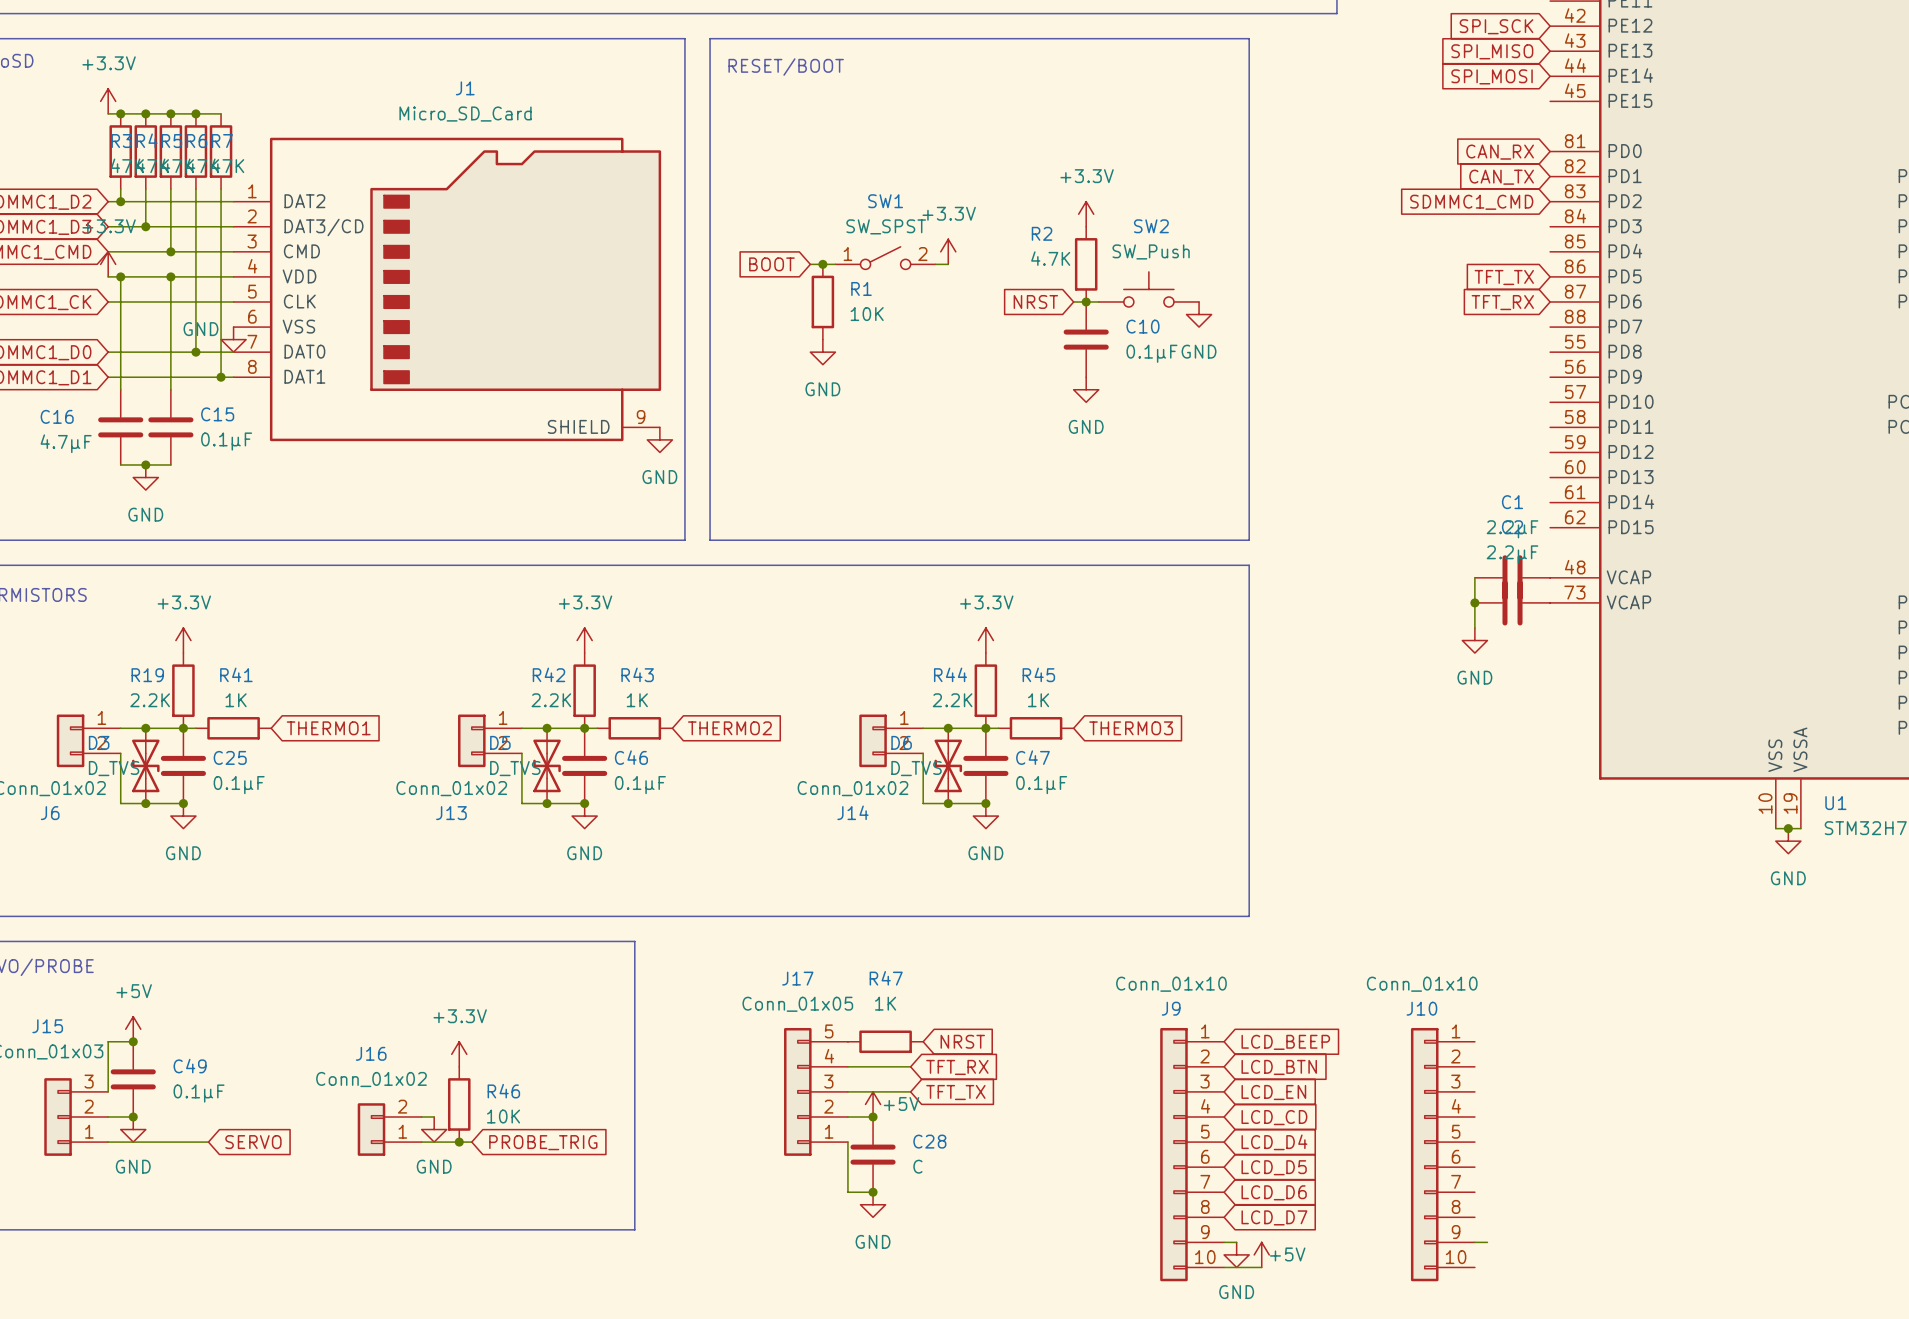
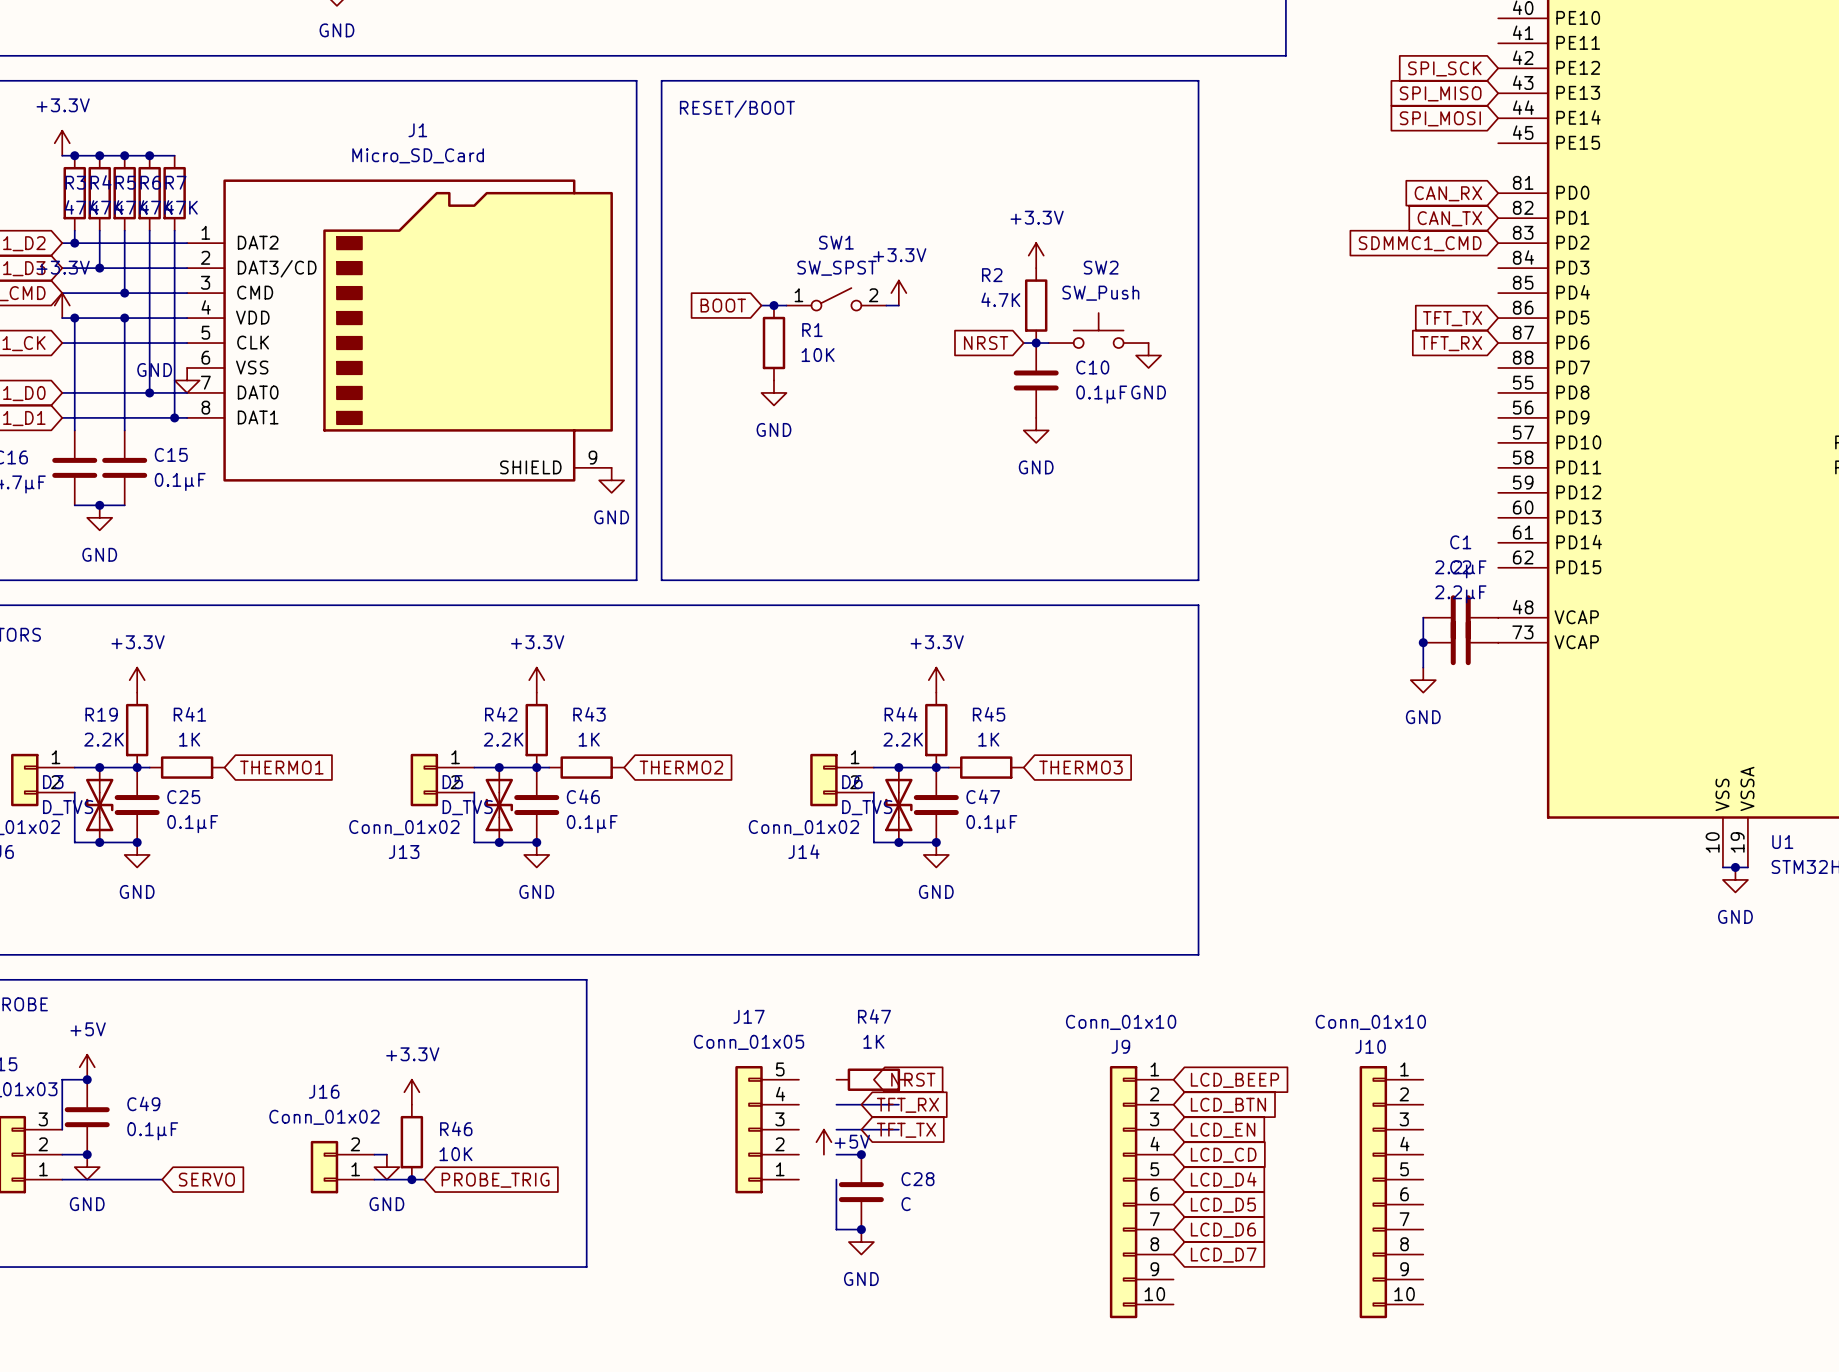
R47 position: (885, 1041) -> (873, 1079)
wire: (847, 1066) (885, 1066) -> (861, 1104) (898, 1104)
wire: (847, 1091) (885, 1091) -> (861, 1129) (898, 1129)
wire: (847, 1117) (873, 1117) -> (836, 1154) (861, 1154)
junction position: (873, 1117) -> (861, 1154)
wire: (847, 1142) (847, 1192) (873, 1192) -> (836, 1179) (836, 1229) (861, 1229)
C28 position: (873, 1154) -> (861, 1192)
junction position: (873, 1192) -> (861, 1229)
power symbol position: GND (873, 1204) -> GND (861, 1242)
wire: (1224, 1242) (1236, 1242) -> none
wire: (1474, 1242) (1487, 1242) -> none
power symbol: GND (1236, 1254) -> none
power symbol: +5V (1261, 1254) -> none
wire: (1224, 1267) (1261, 1267) -> none

